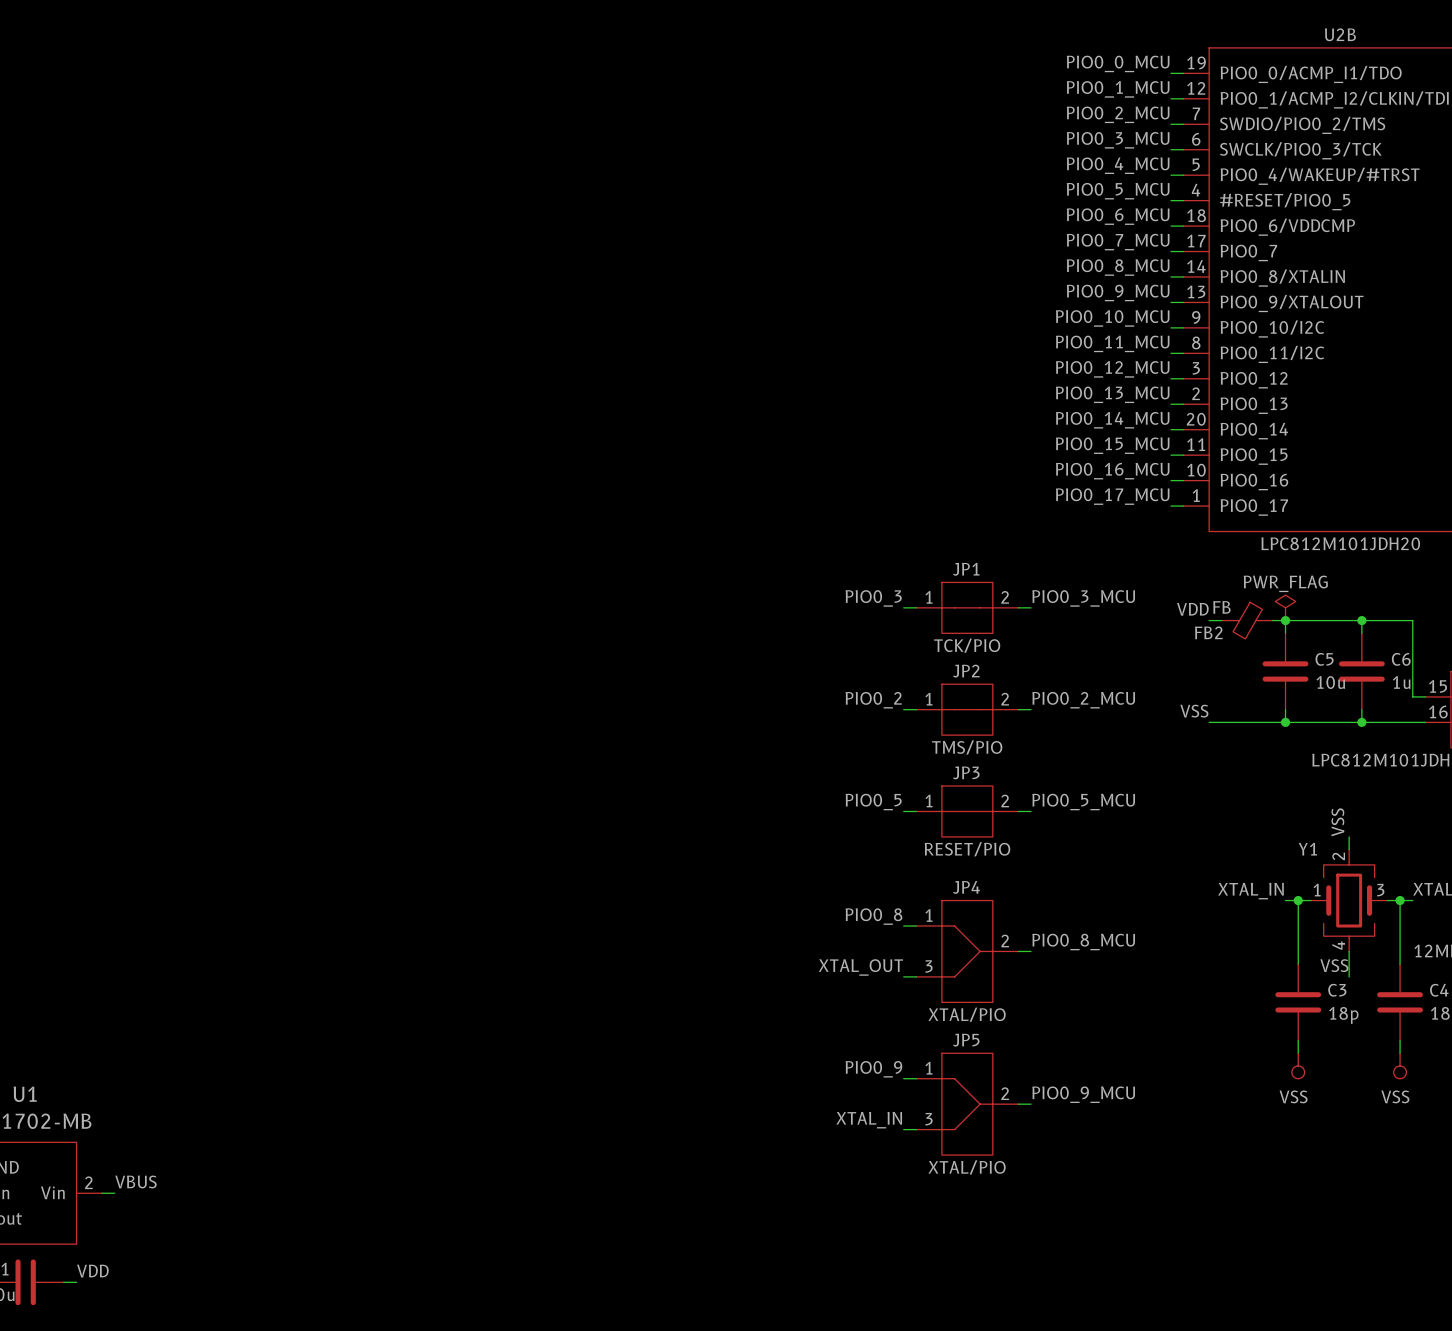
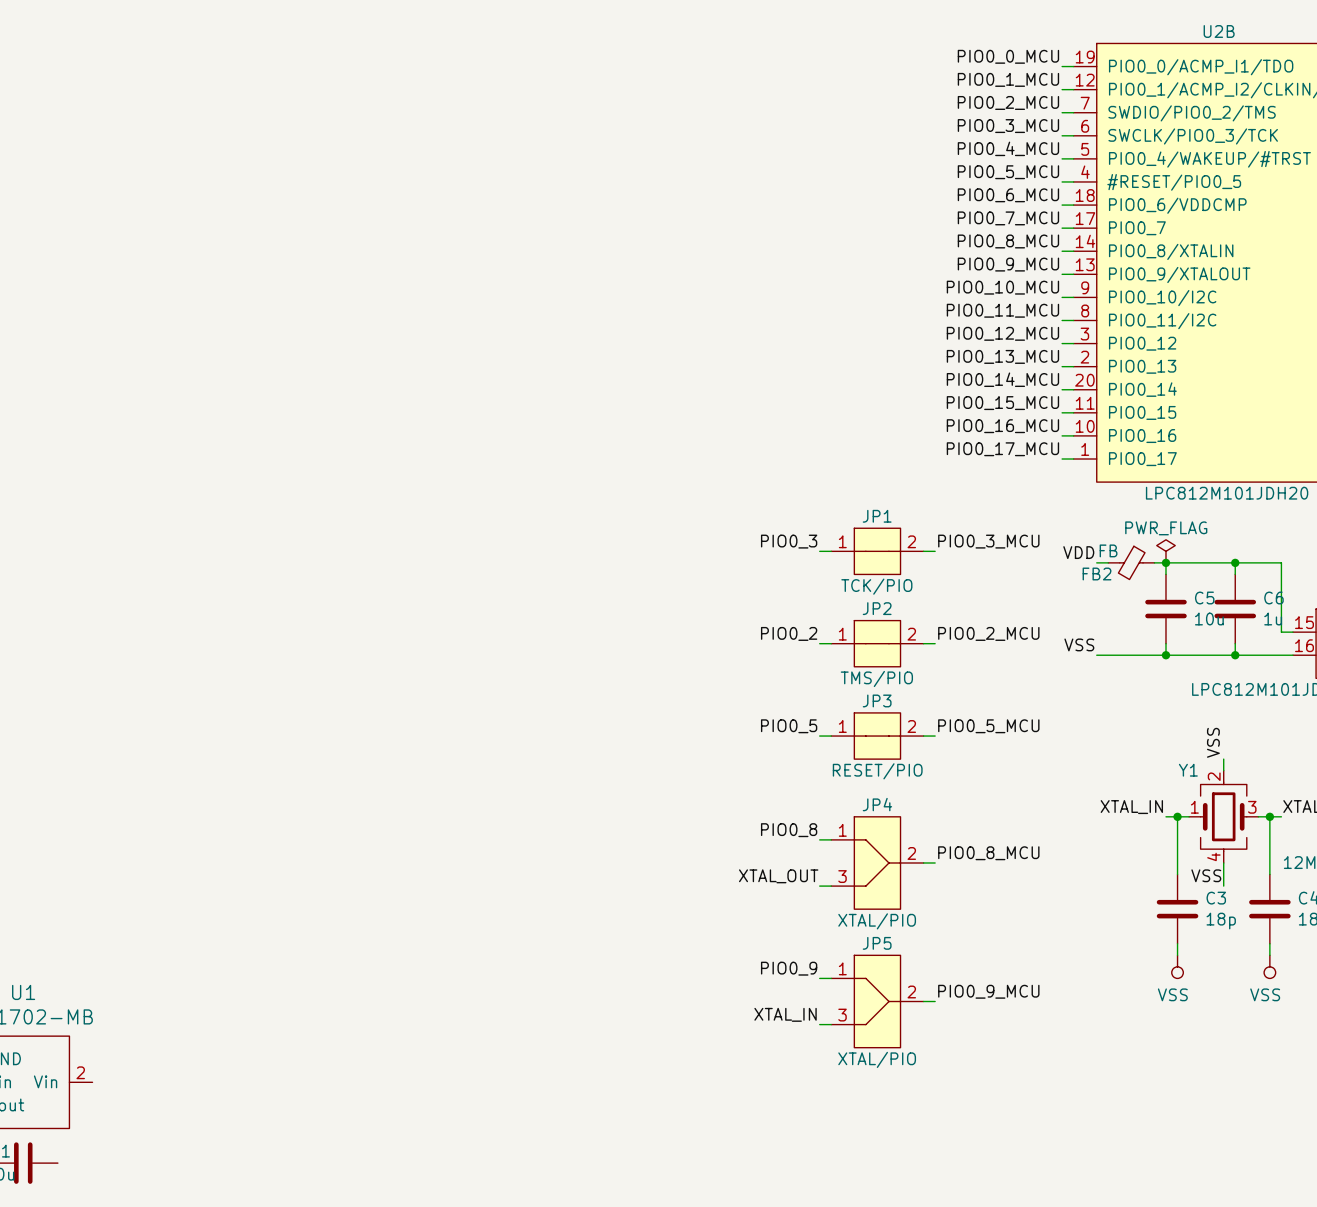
label: VBUS (135, 1181) -> none
wire: (102, 1193) (114, 1193) -> none
label: VDD (92, 1271) -> none
wire: (63, 1282) (76, 1282) -> none

